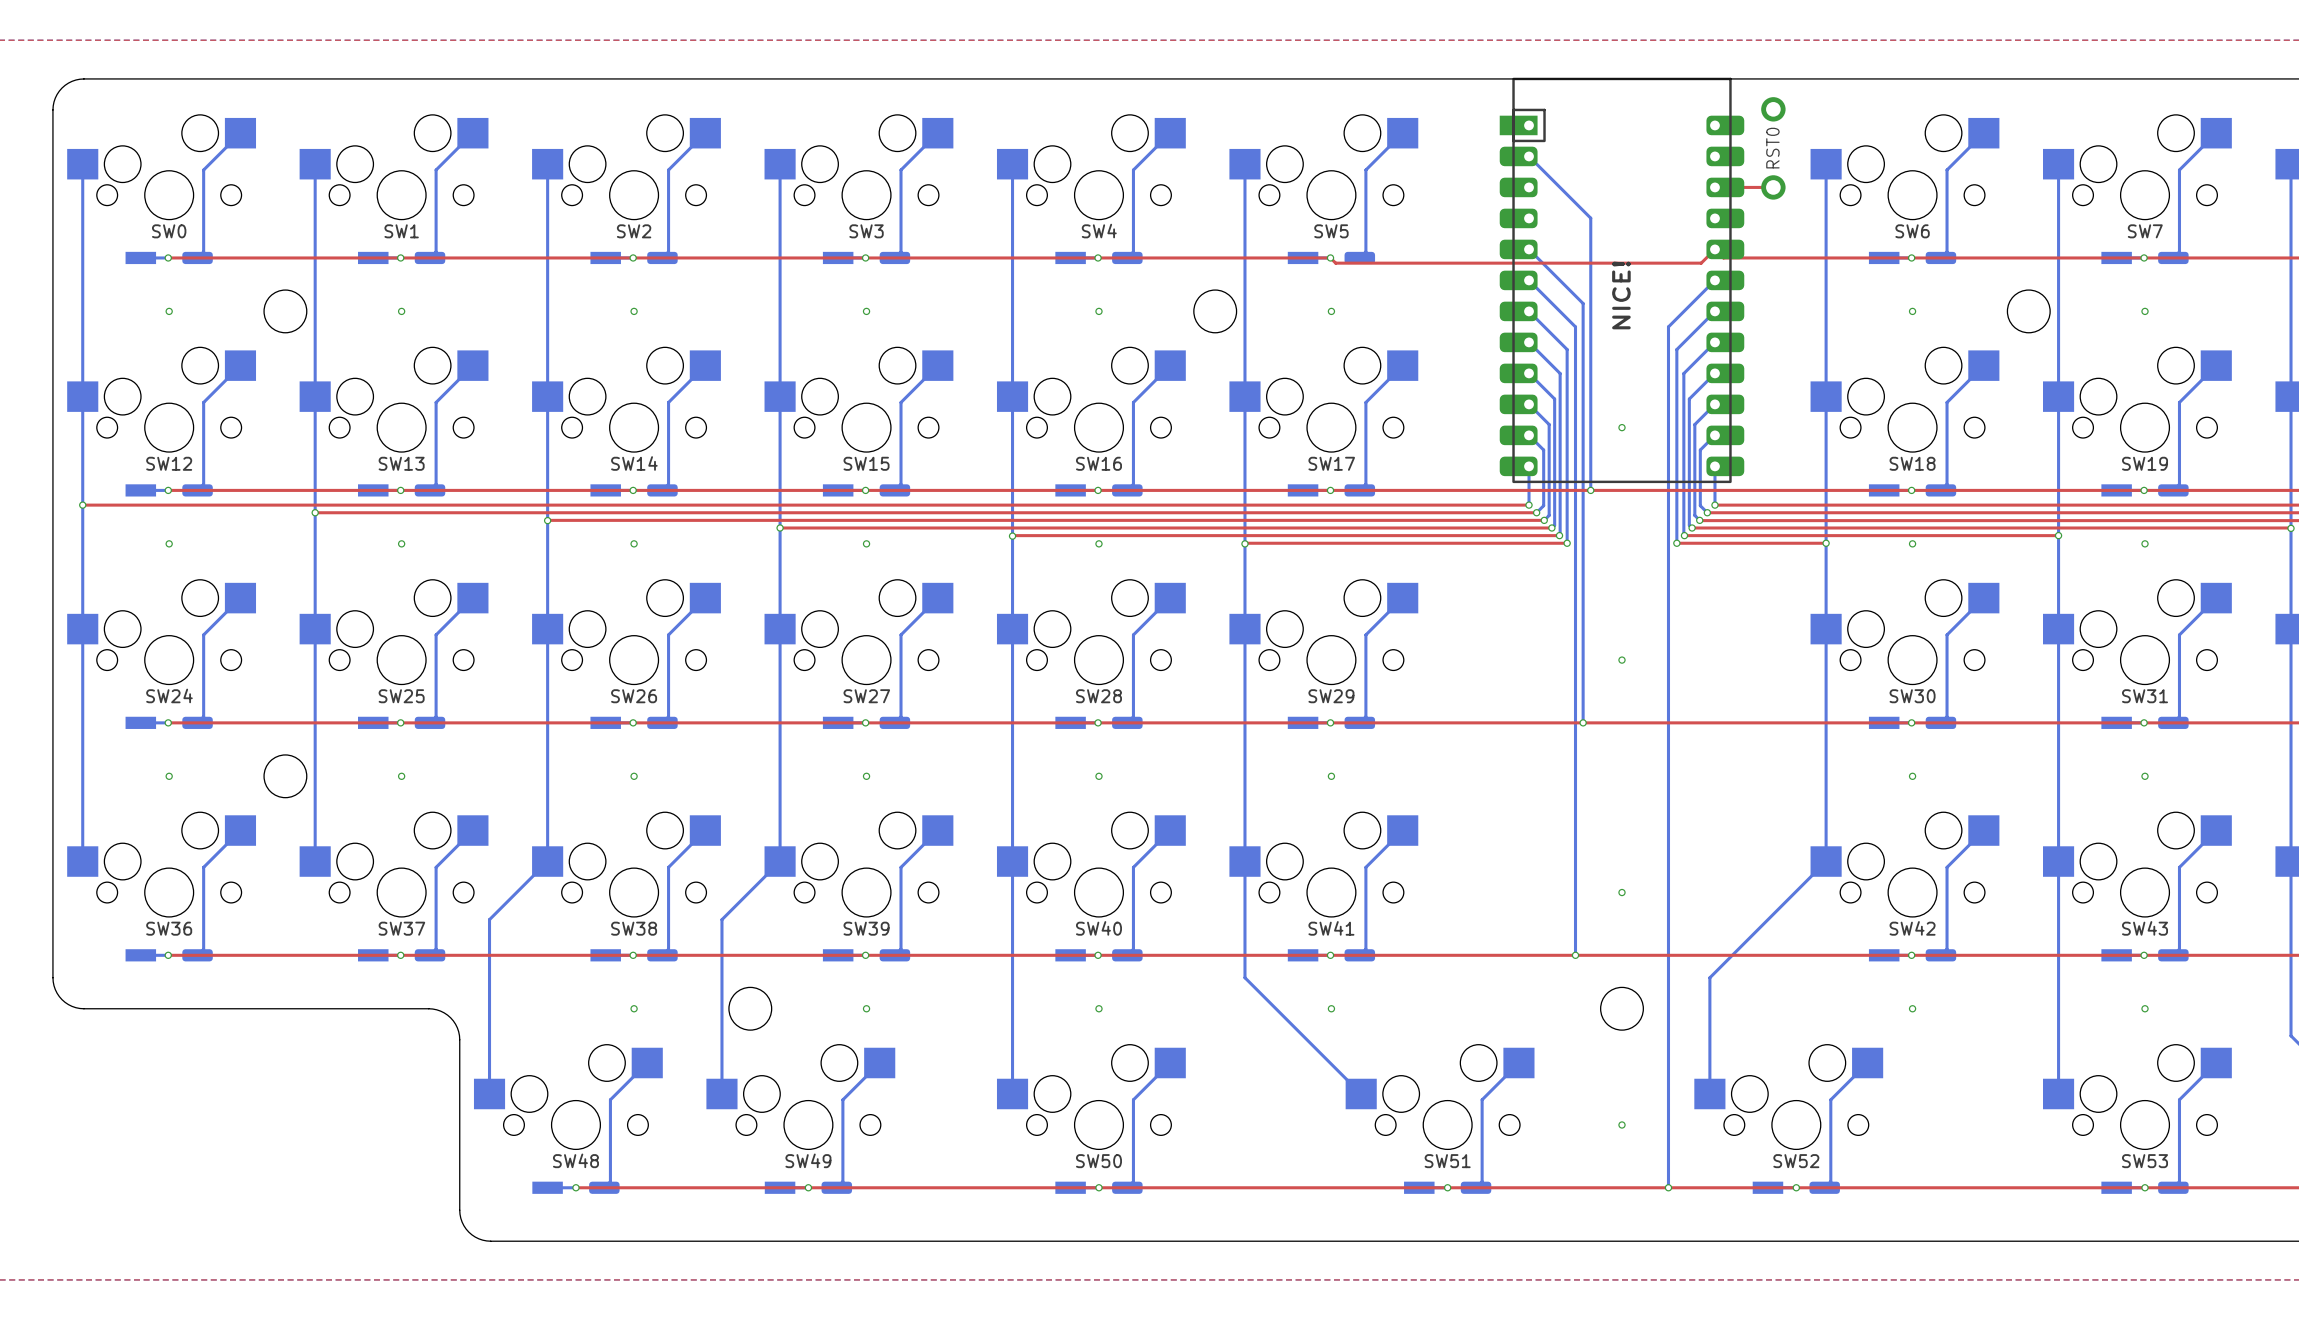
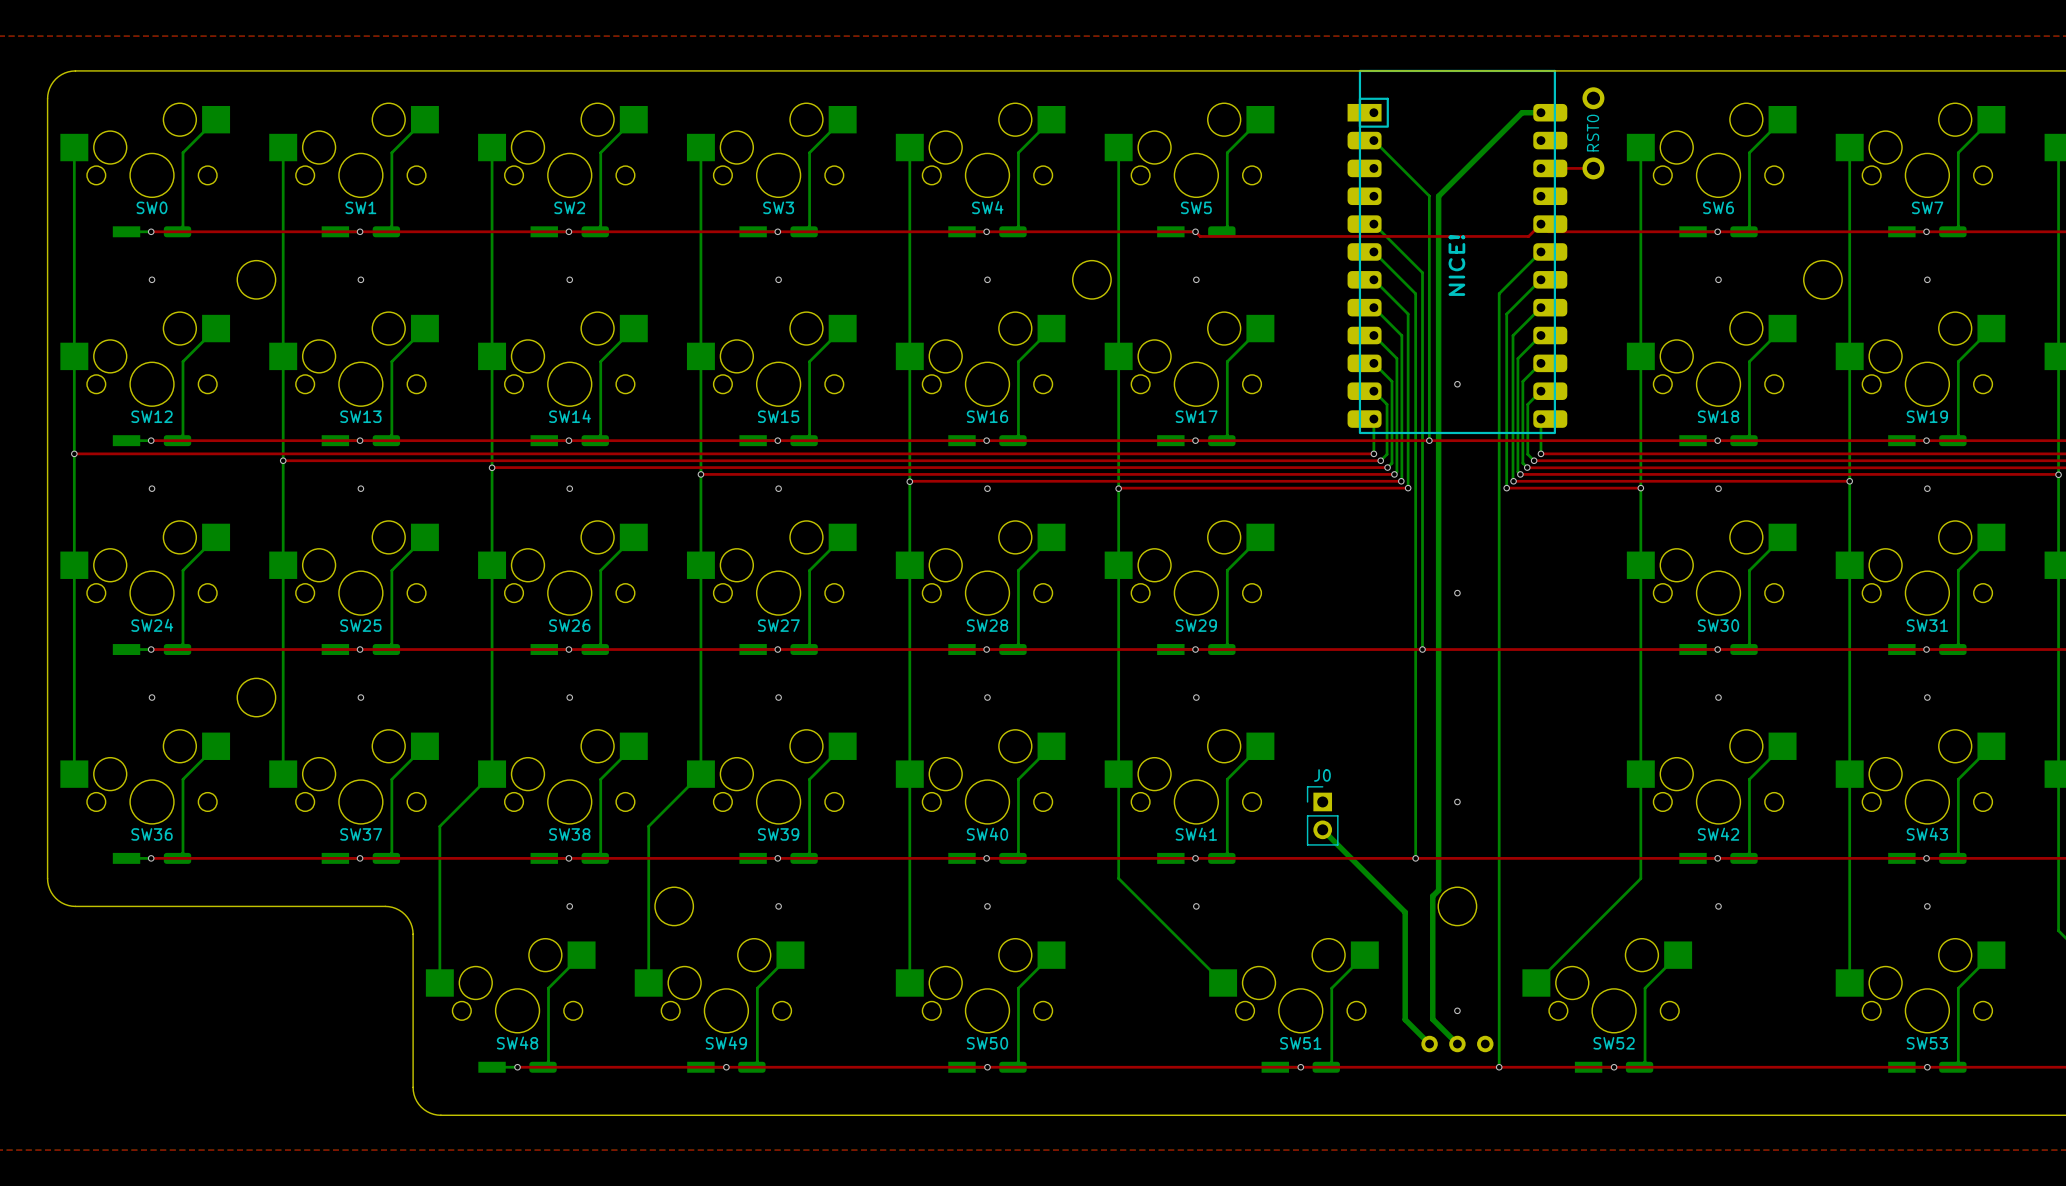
bottom track: none -> (1540, 112) (1522, 112) (1438, 196) (1438, 890) (1432, 896) (1432, 1019) (1457, 1044)
bottom track: (1826, 861) (1709, 977) (1709, 1093) -> (1640, 774) (1640, 878) (1536, 982)
J0: none -> (1322, 815)
bottom track: none -> (1322, 829) (1405, 912) (1405, 1019) (1429, 1044)
part: none -> (1457, 1044)

